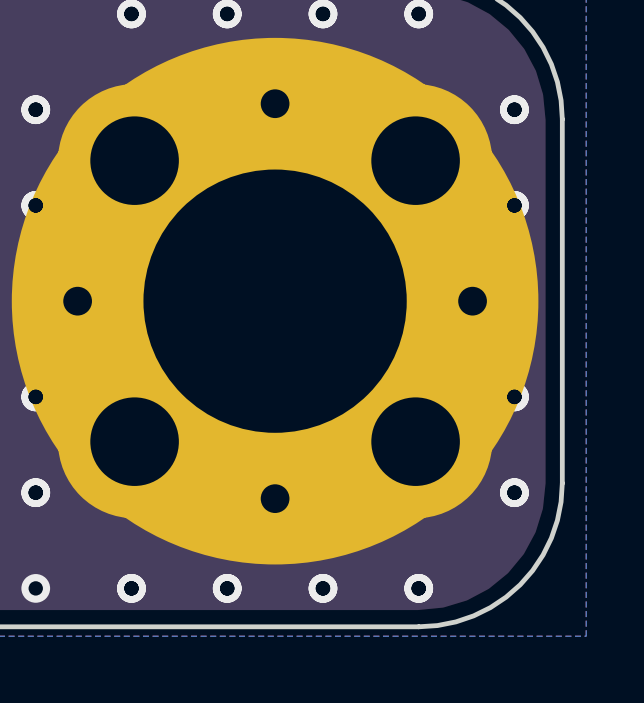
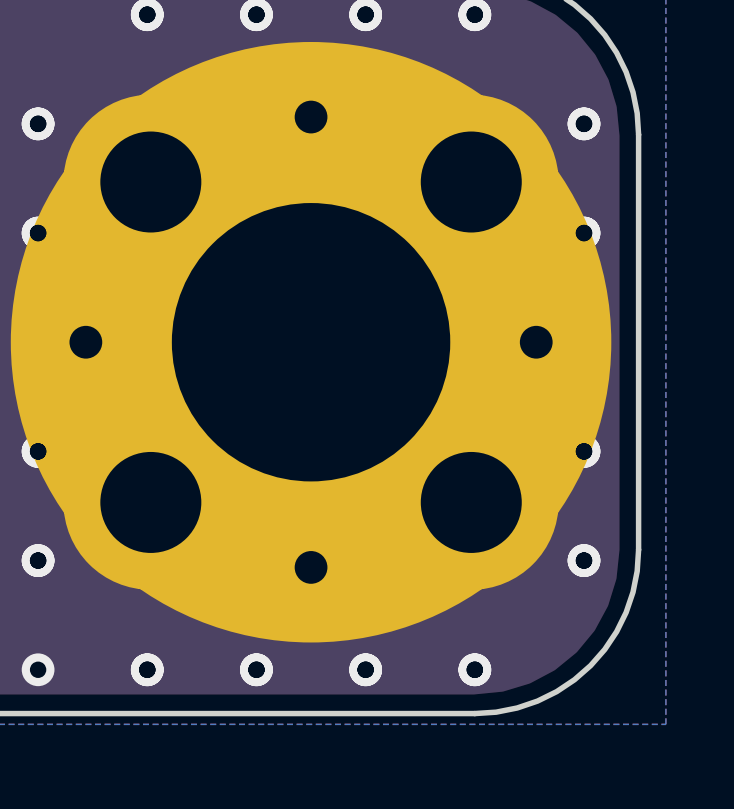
part footprint: [11, 37, 539, 565] -> [10, 41, 612, 643]

